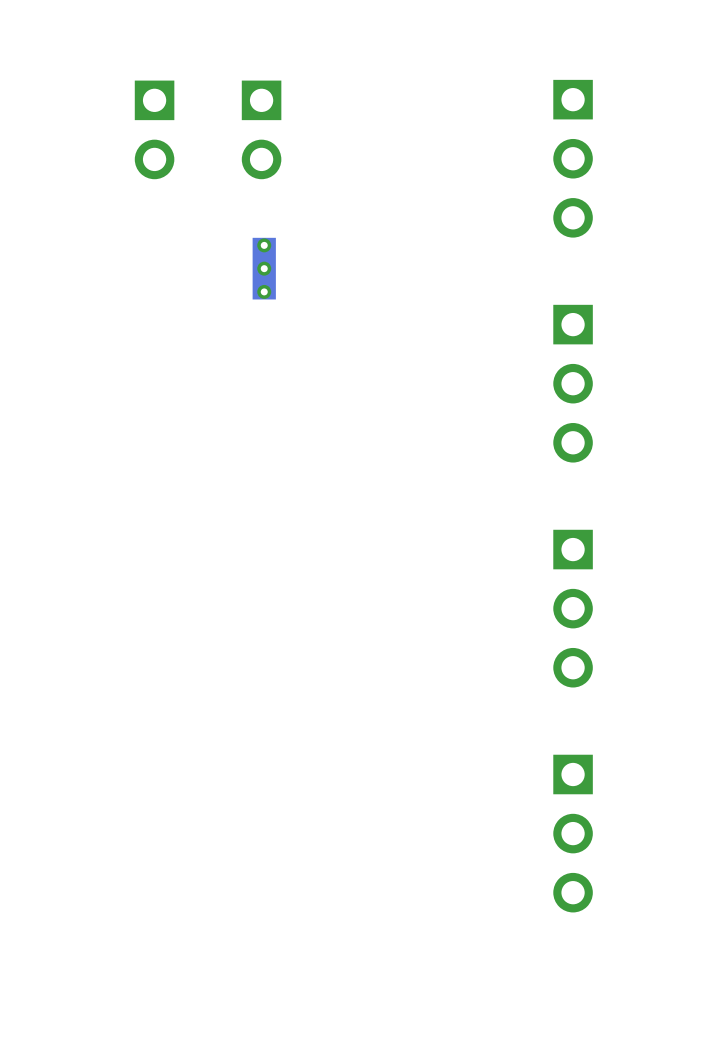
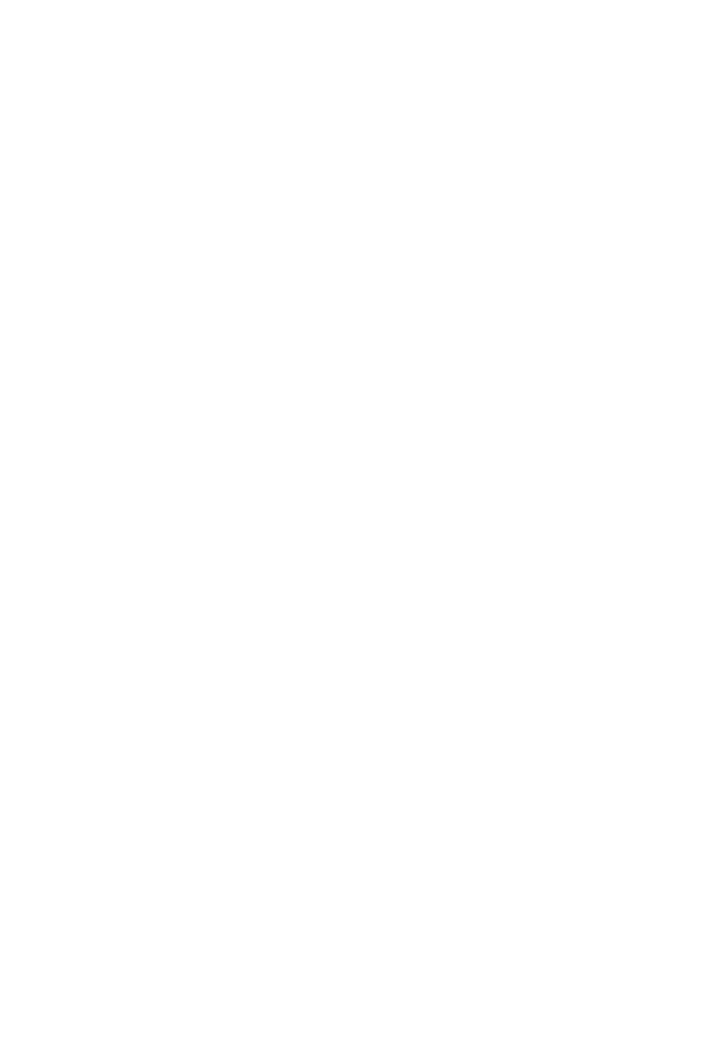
part: (154, 129) -> none
part: (261, 129) -> none
part: (573, 158) -> none
part: (264, 268) -> none
part: (573, 383) -> none
part: (573, 608) -> none
part: (573, 833) -> none

